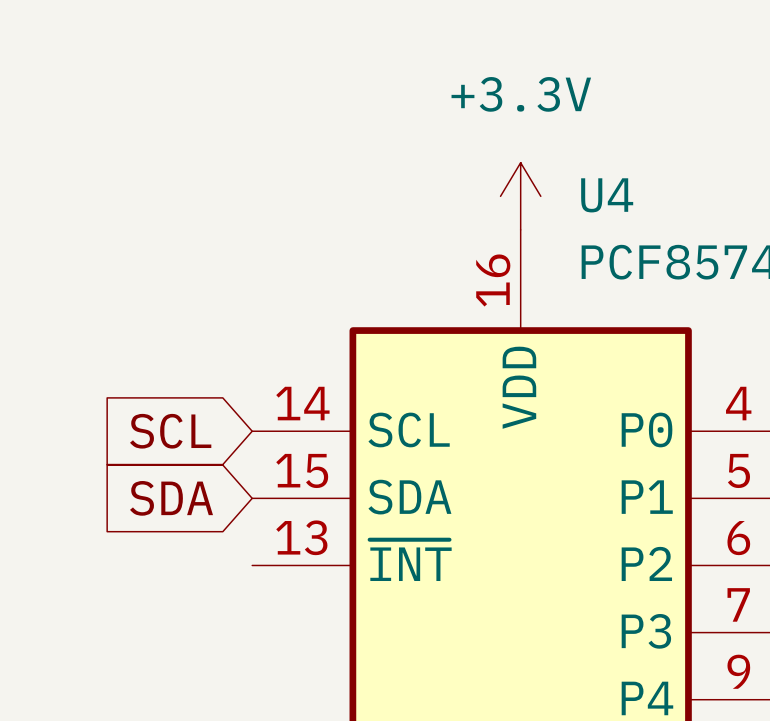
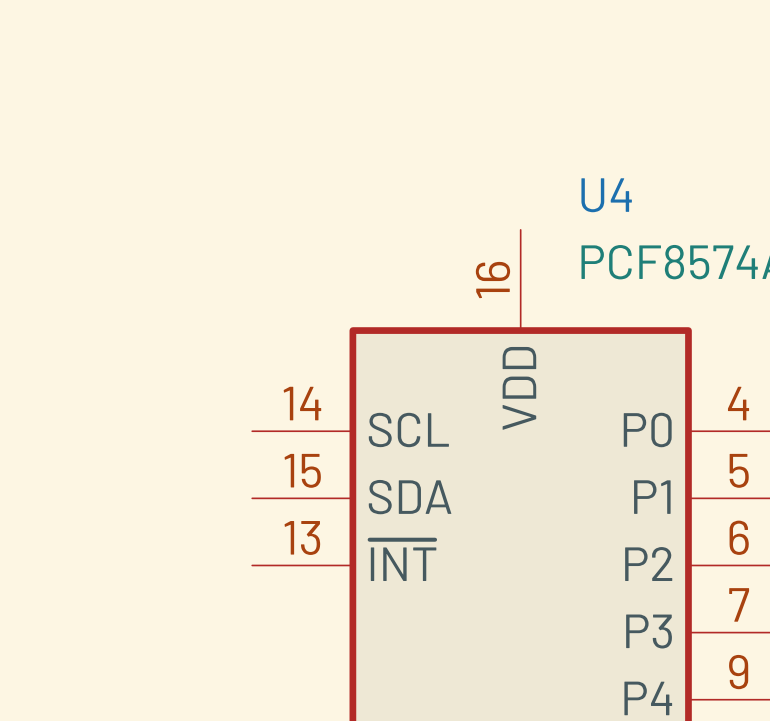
power symbol: +3.3V (520, 196) -> none
global label: SCL (170, 431) -> none
global label: SDA (171, 498) -> none

